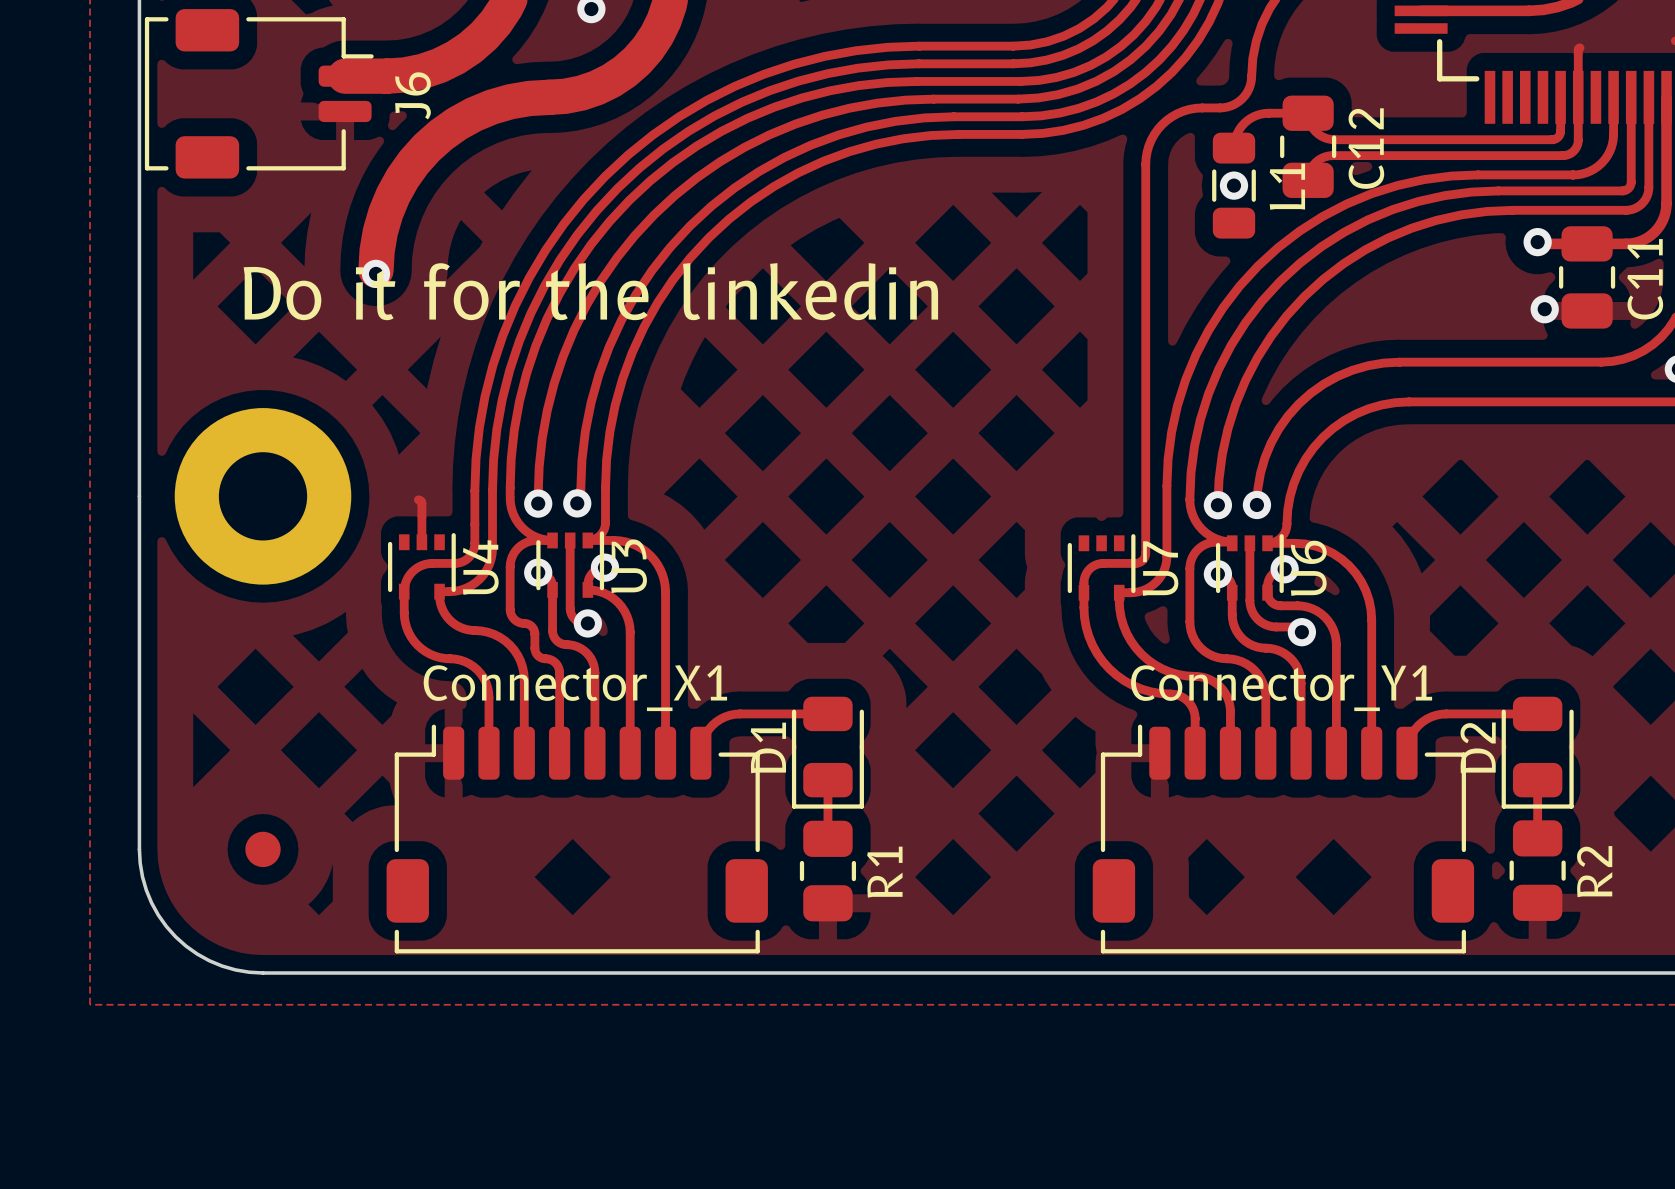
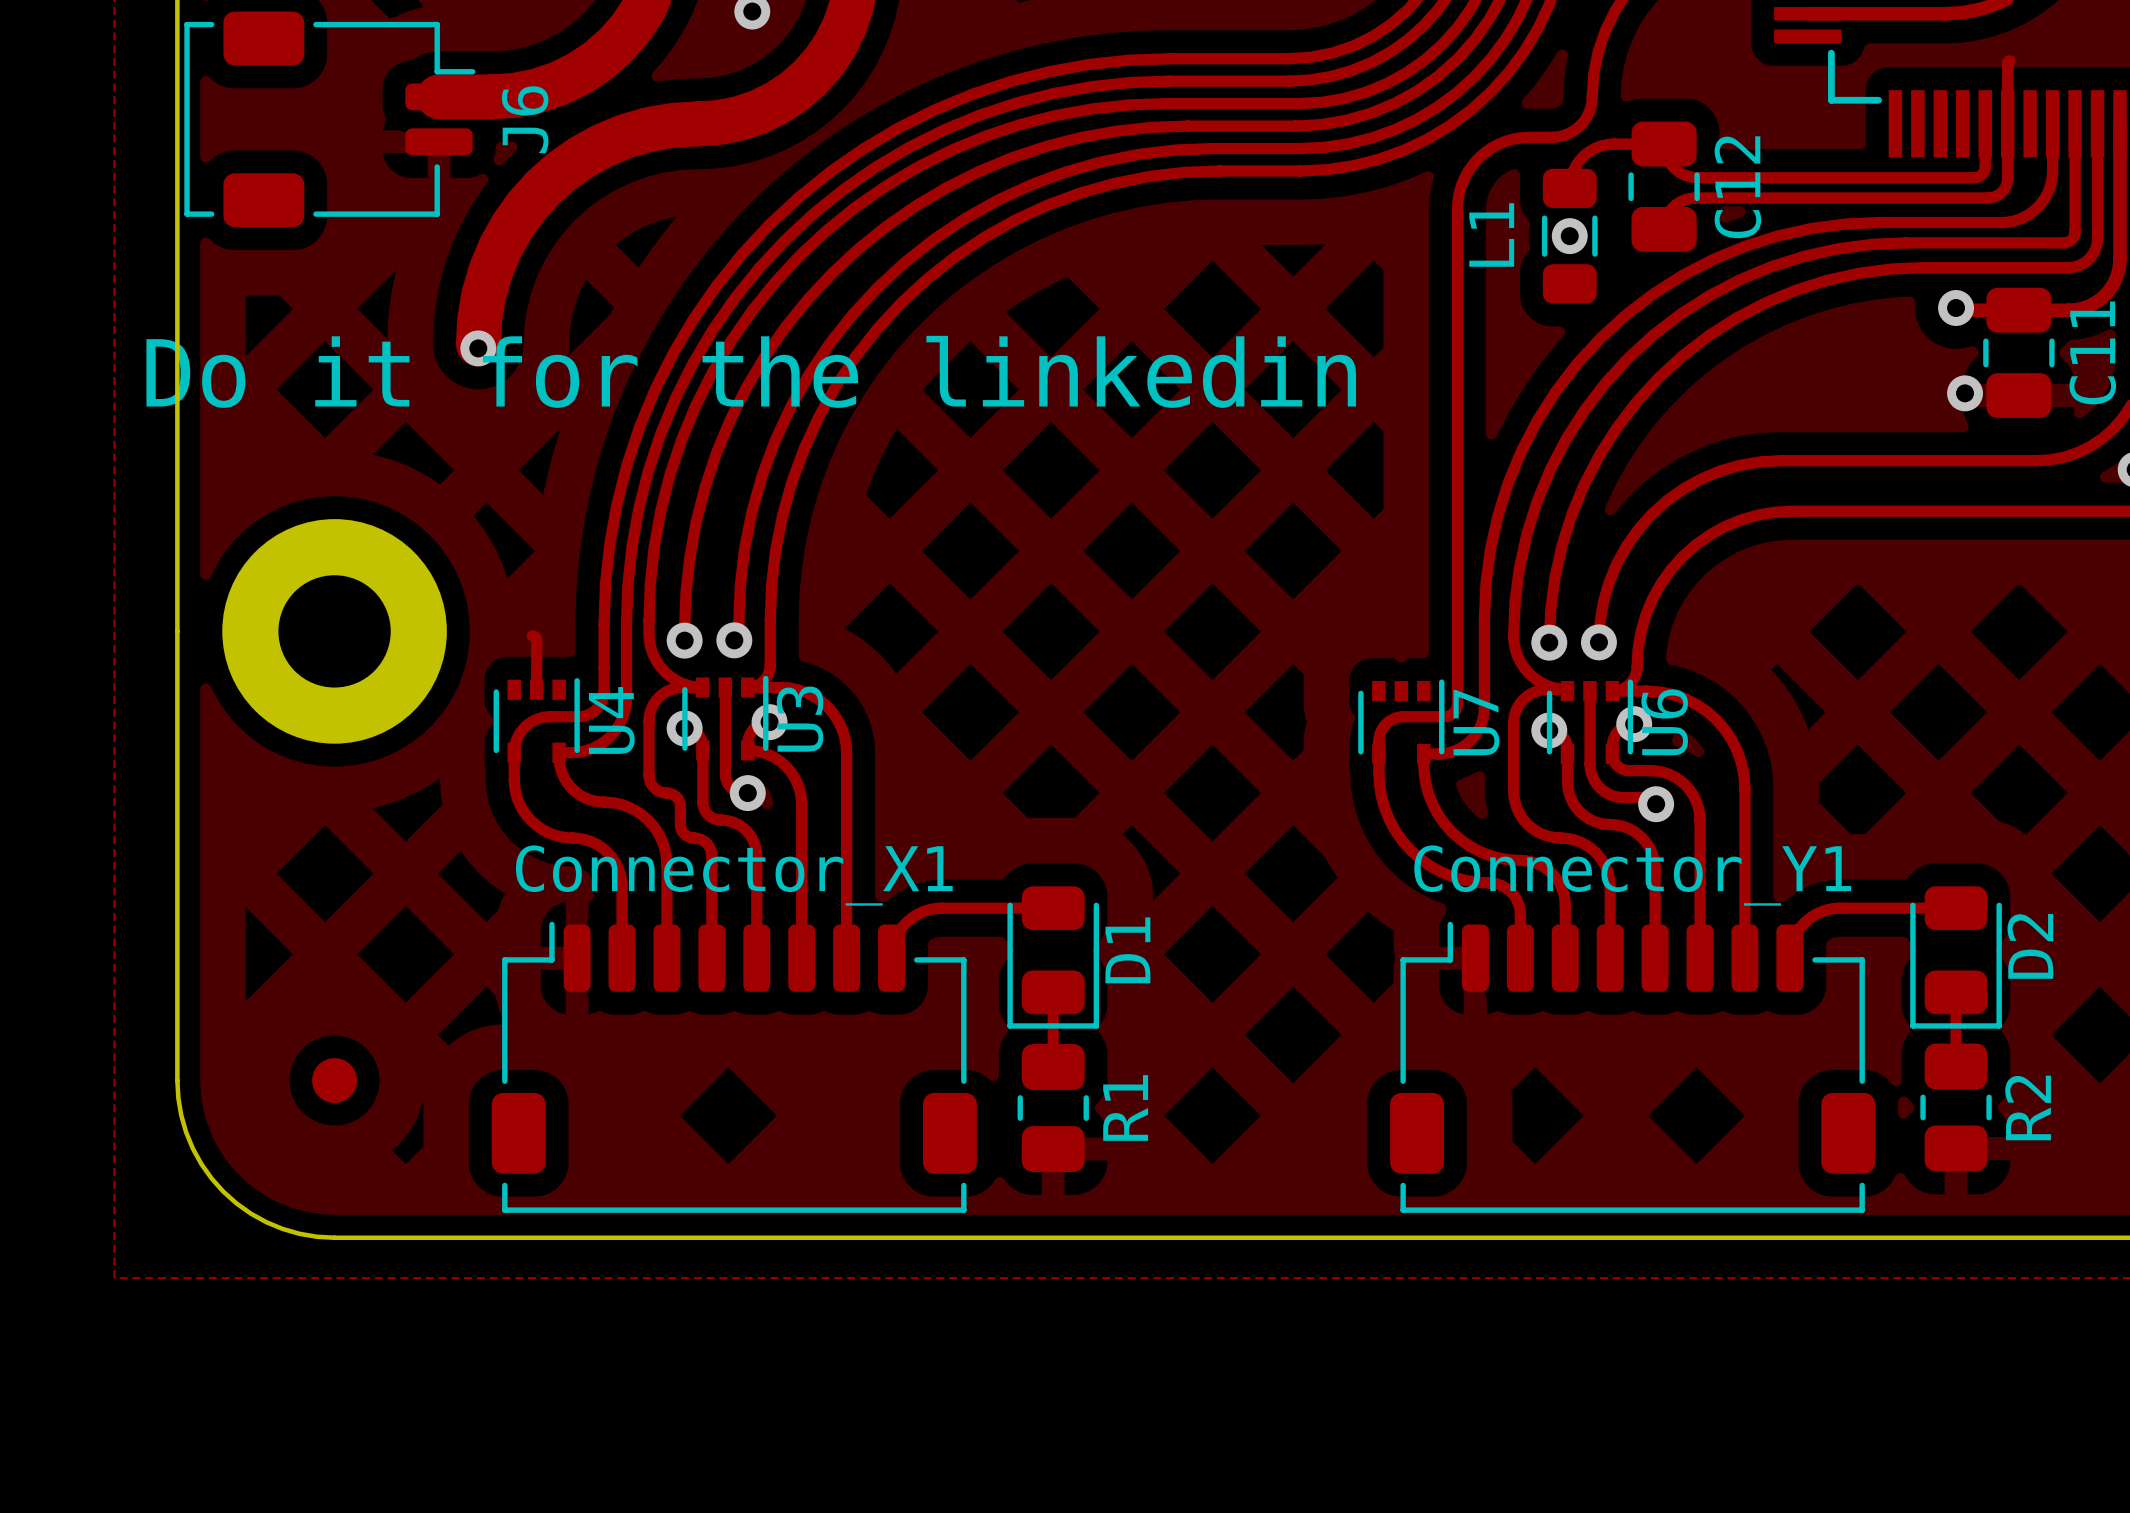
L1 name position: L1 (1287, 186) -> L1 (1491, 234)
D1 name position: D1 (768, 747) -> D1 (1127, 950)
D2 name position: D2 (1478, 747) -> D2 (2030, 946)

